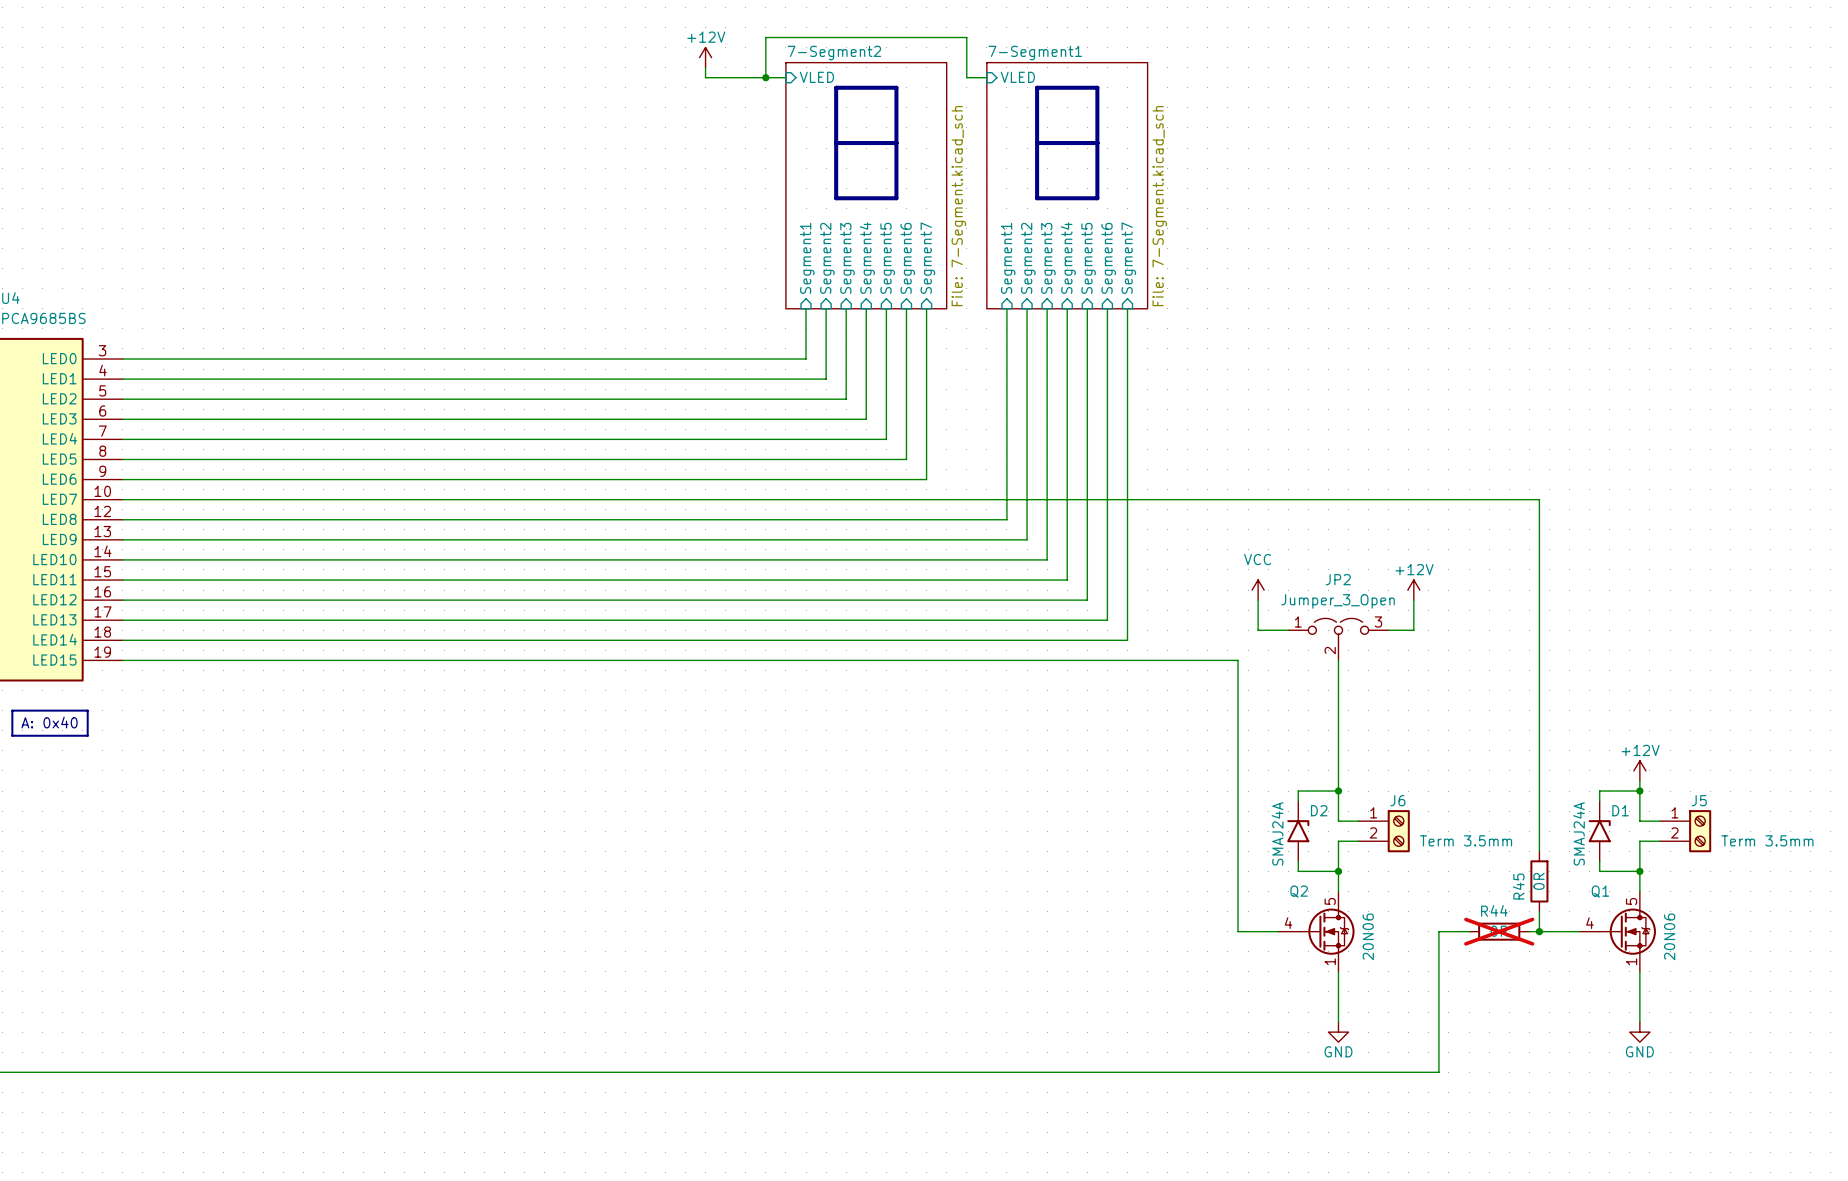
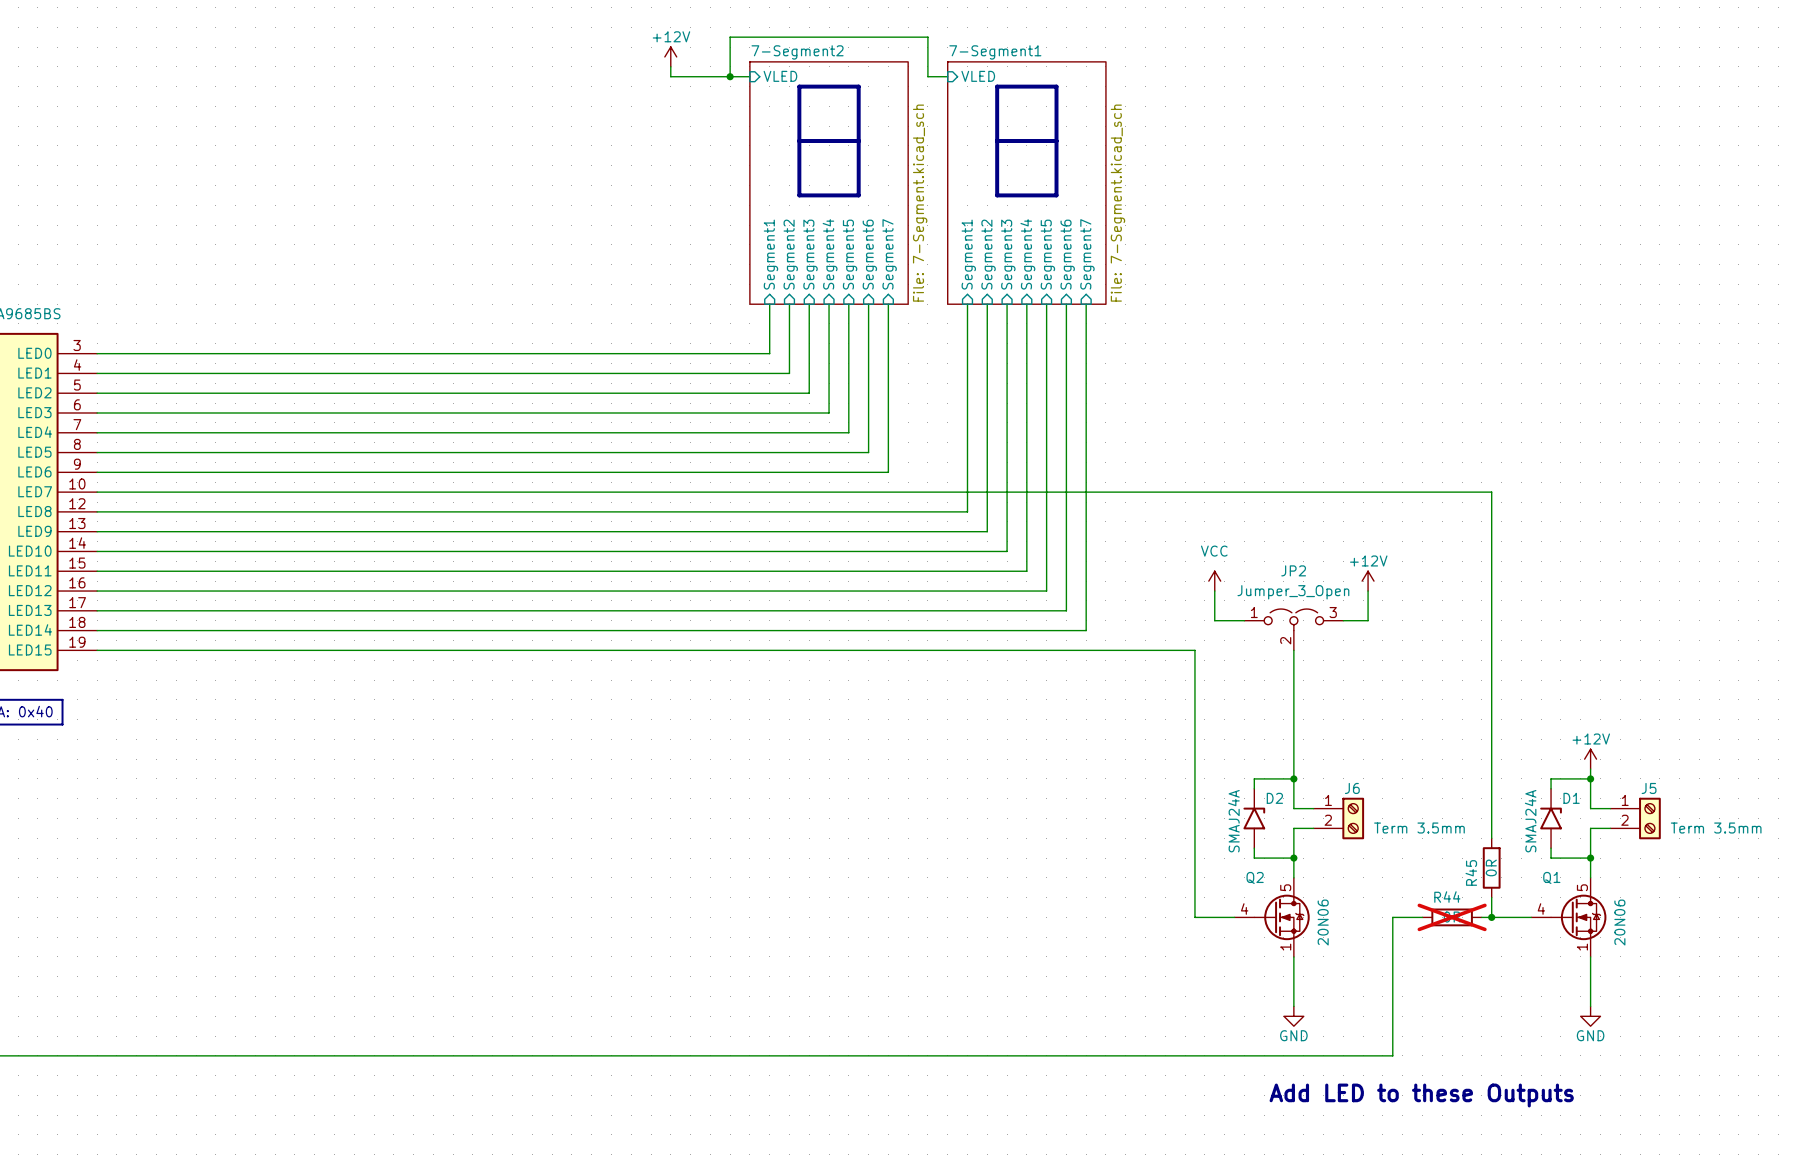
text: none -> Add LED to these Outputs (1421, 1095)

